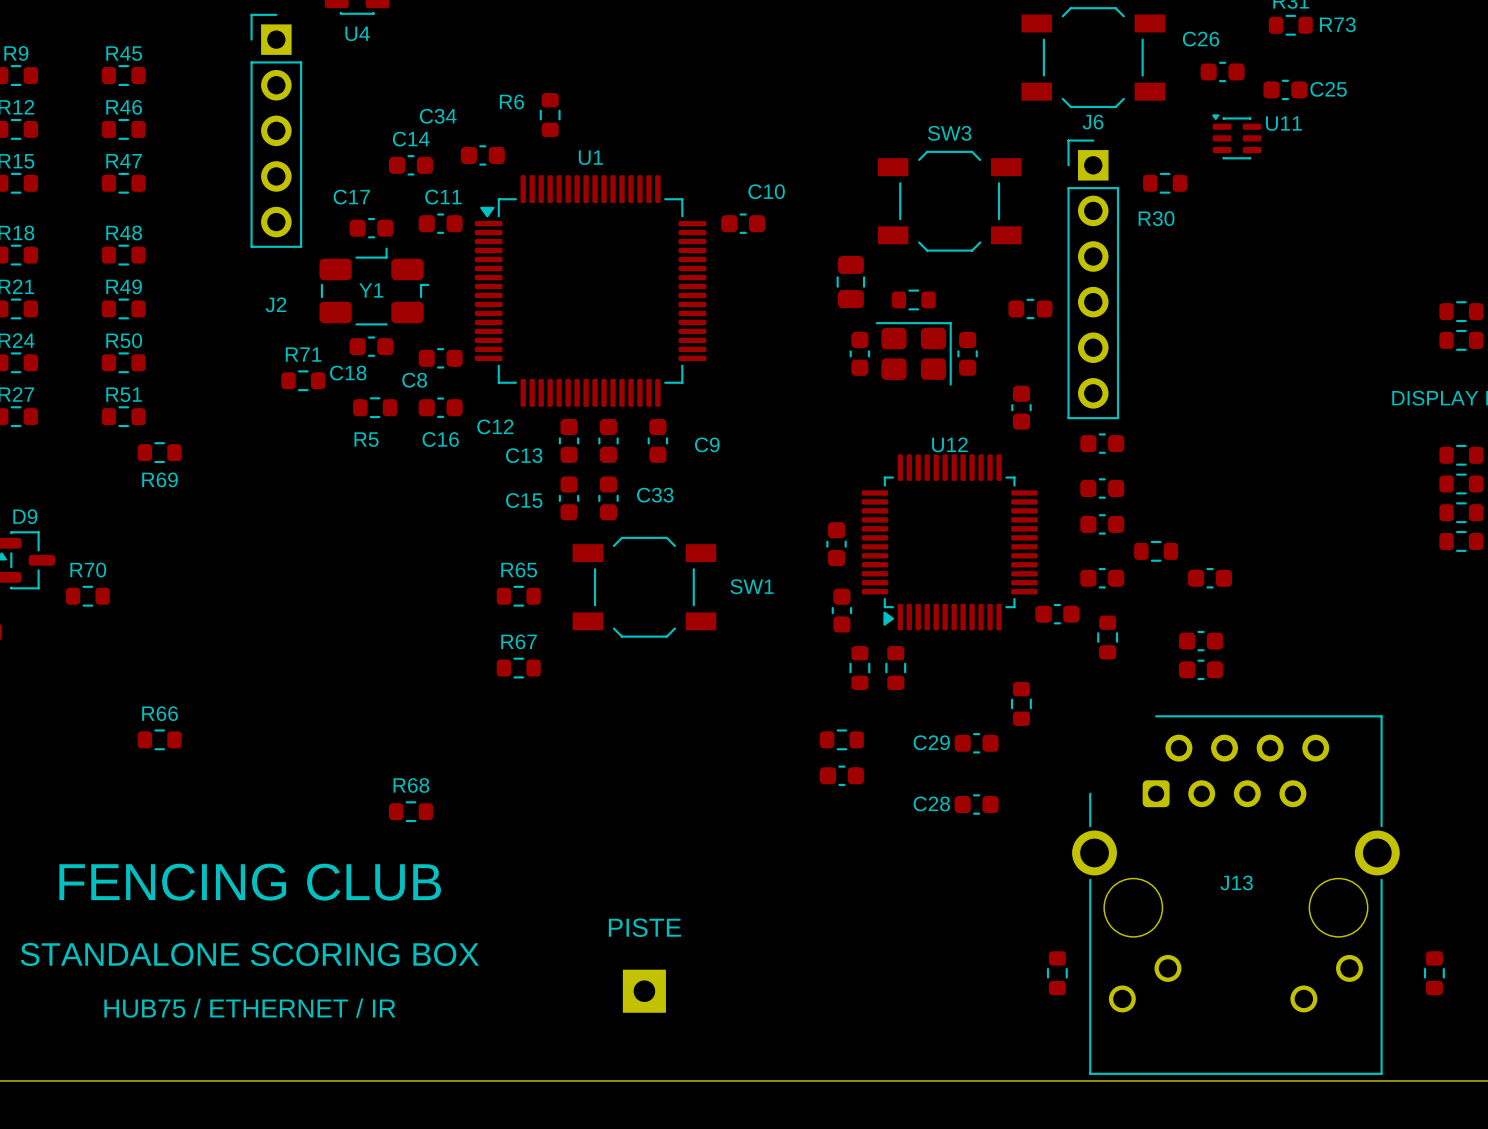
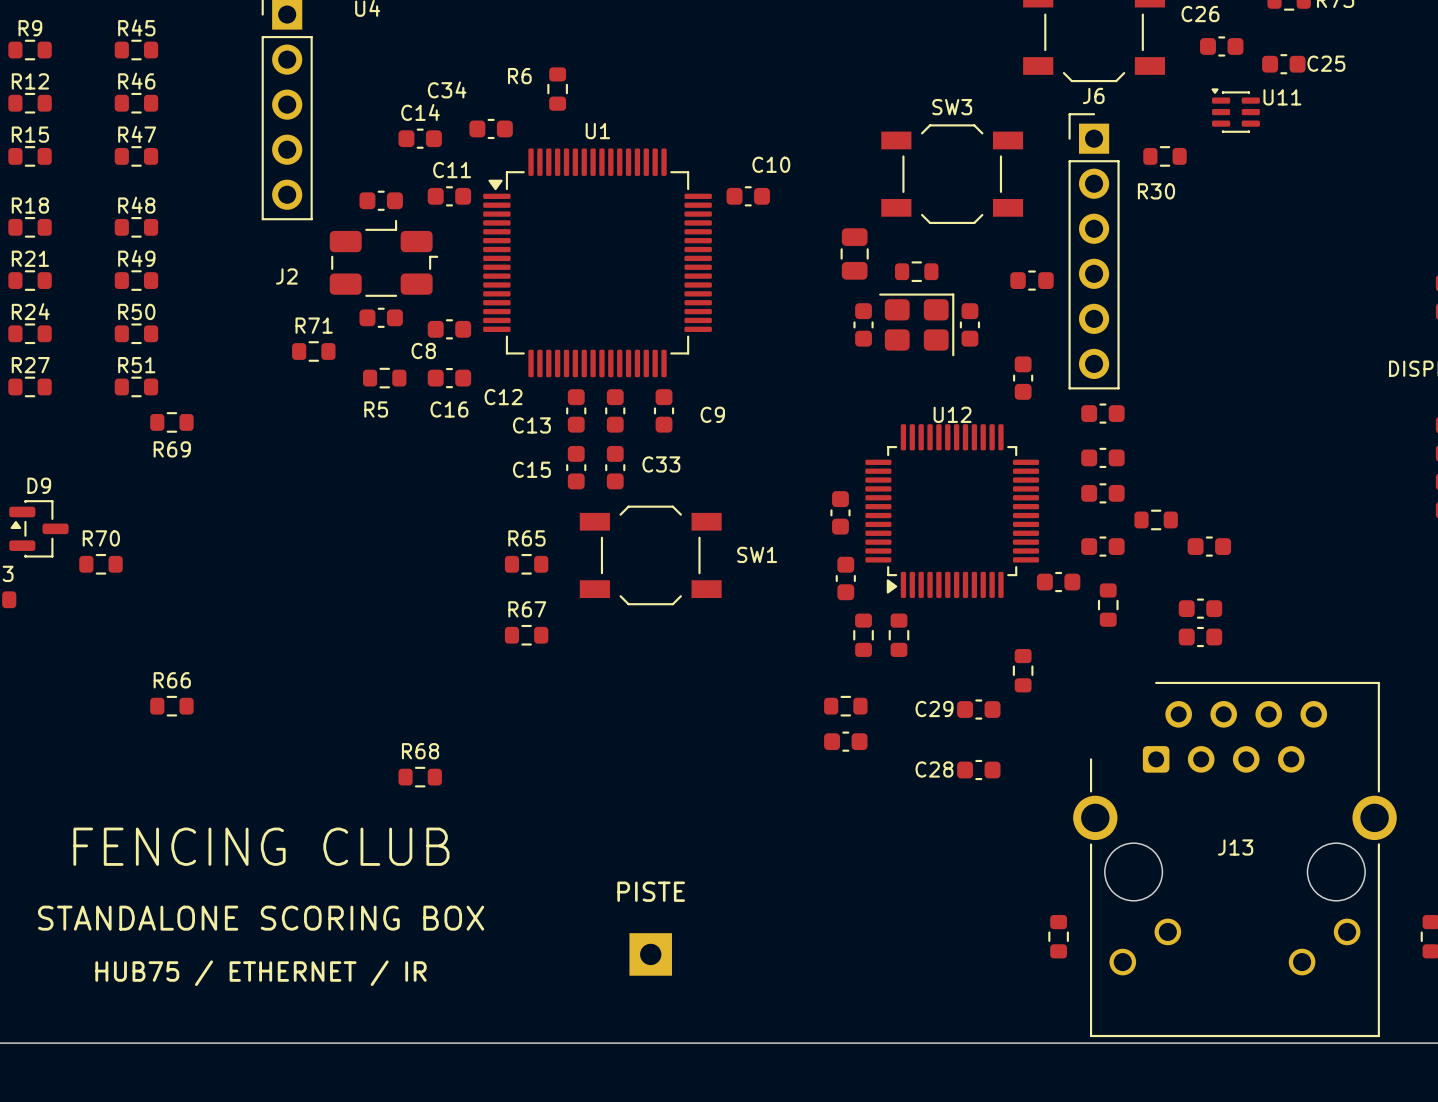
C17 name: C17 (351, 197) -> none
Y1 name: Y1 (371, 290) -> none
C18 name: C18 (348, 373) -> none

